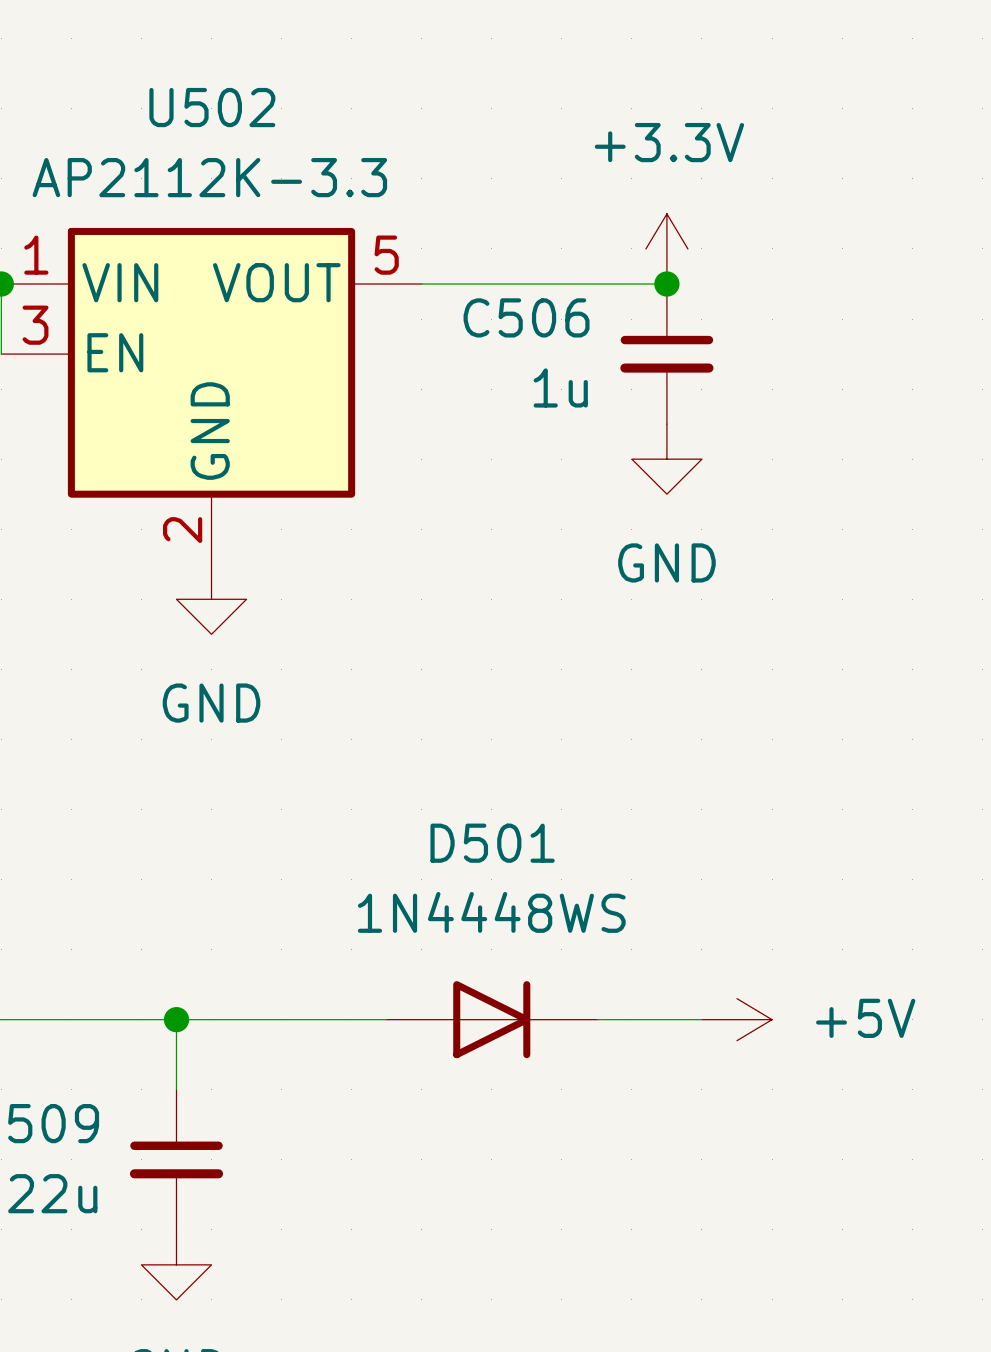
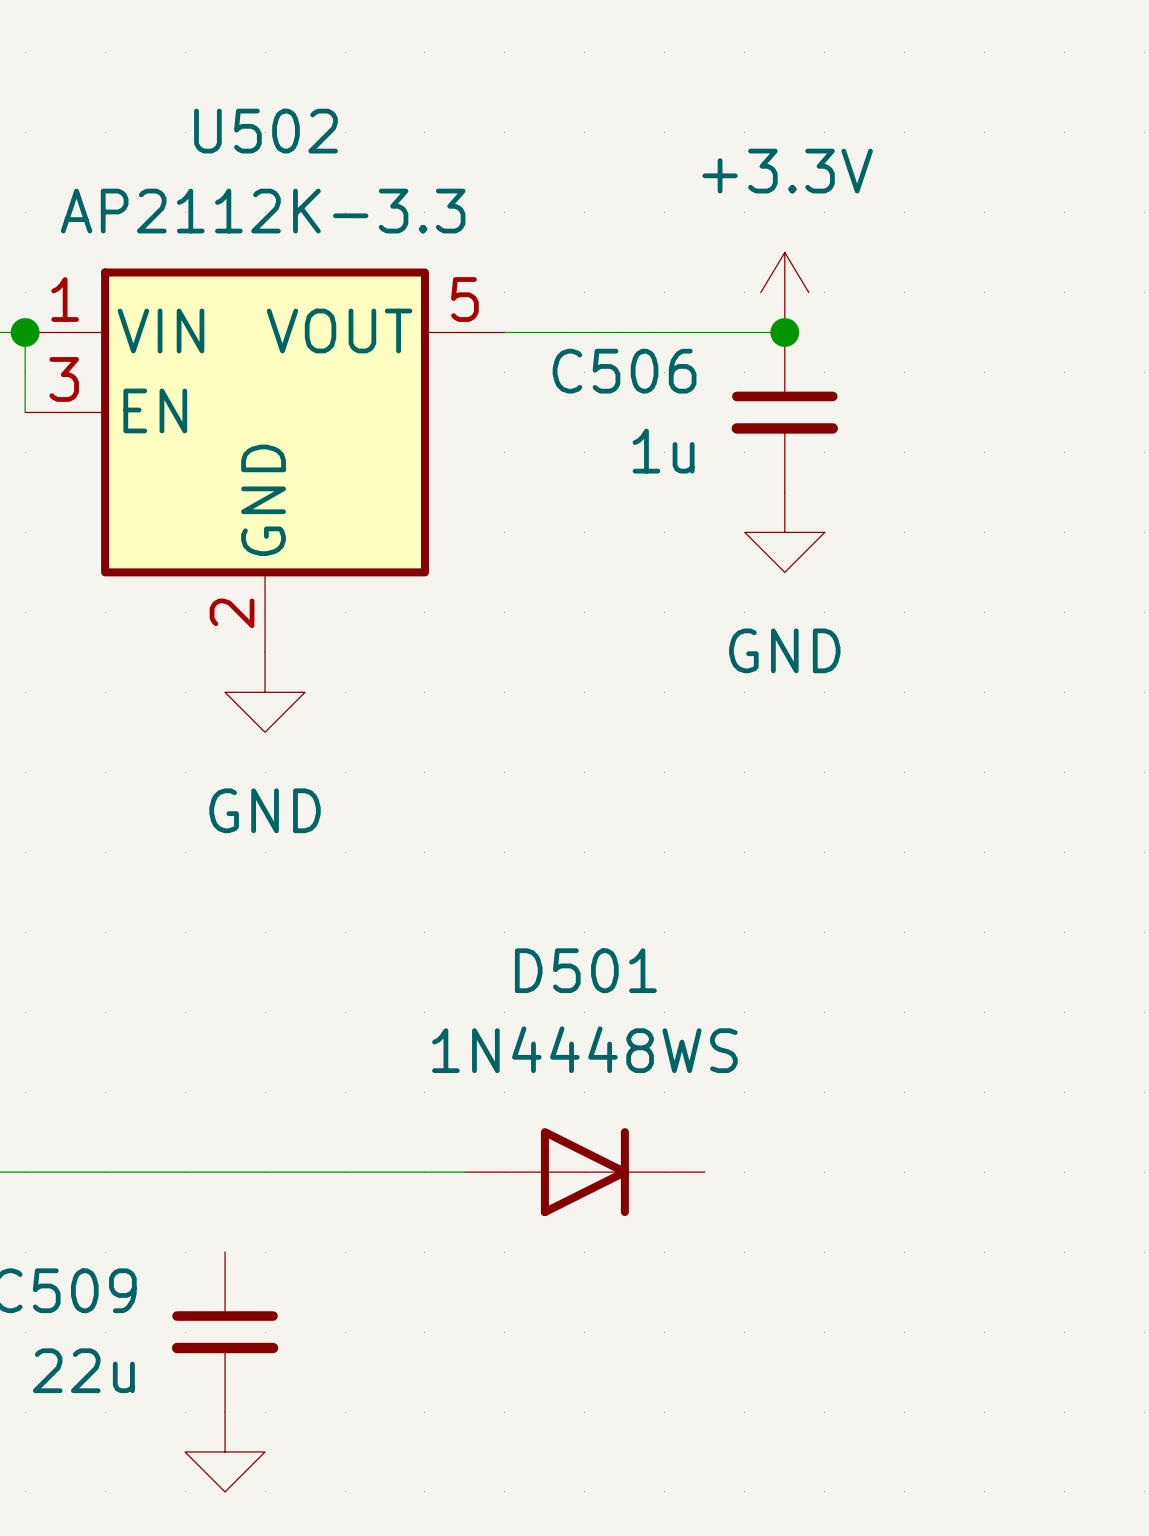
wire: (176, 1019) (176, 1089) -> none
junction: (176, 1019) -> none
wire: (596, 1019) (701, 1019) -> none
power symbol: +5V (736, 1019) -> none

